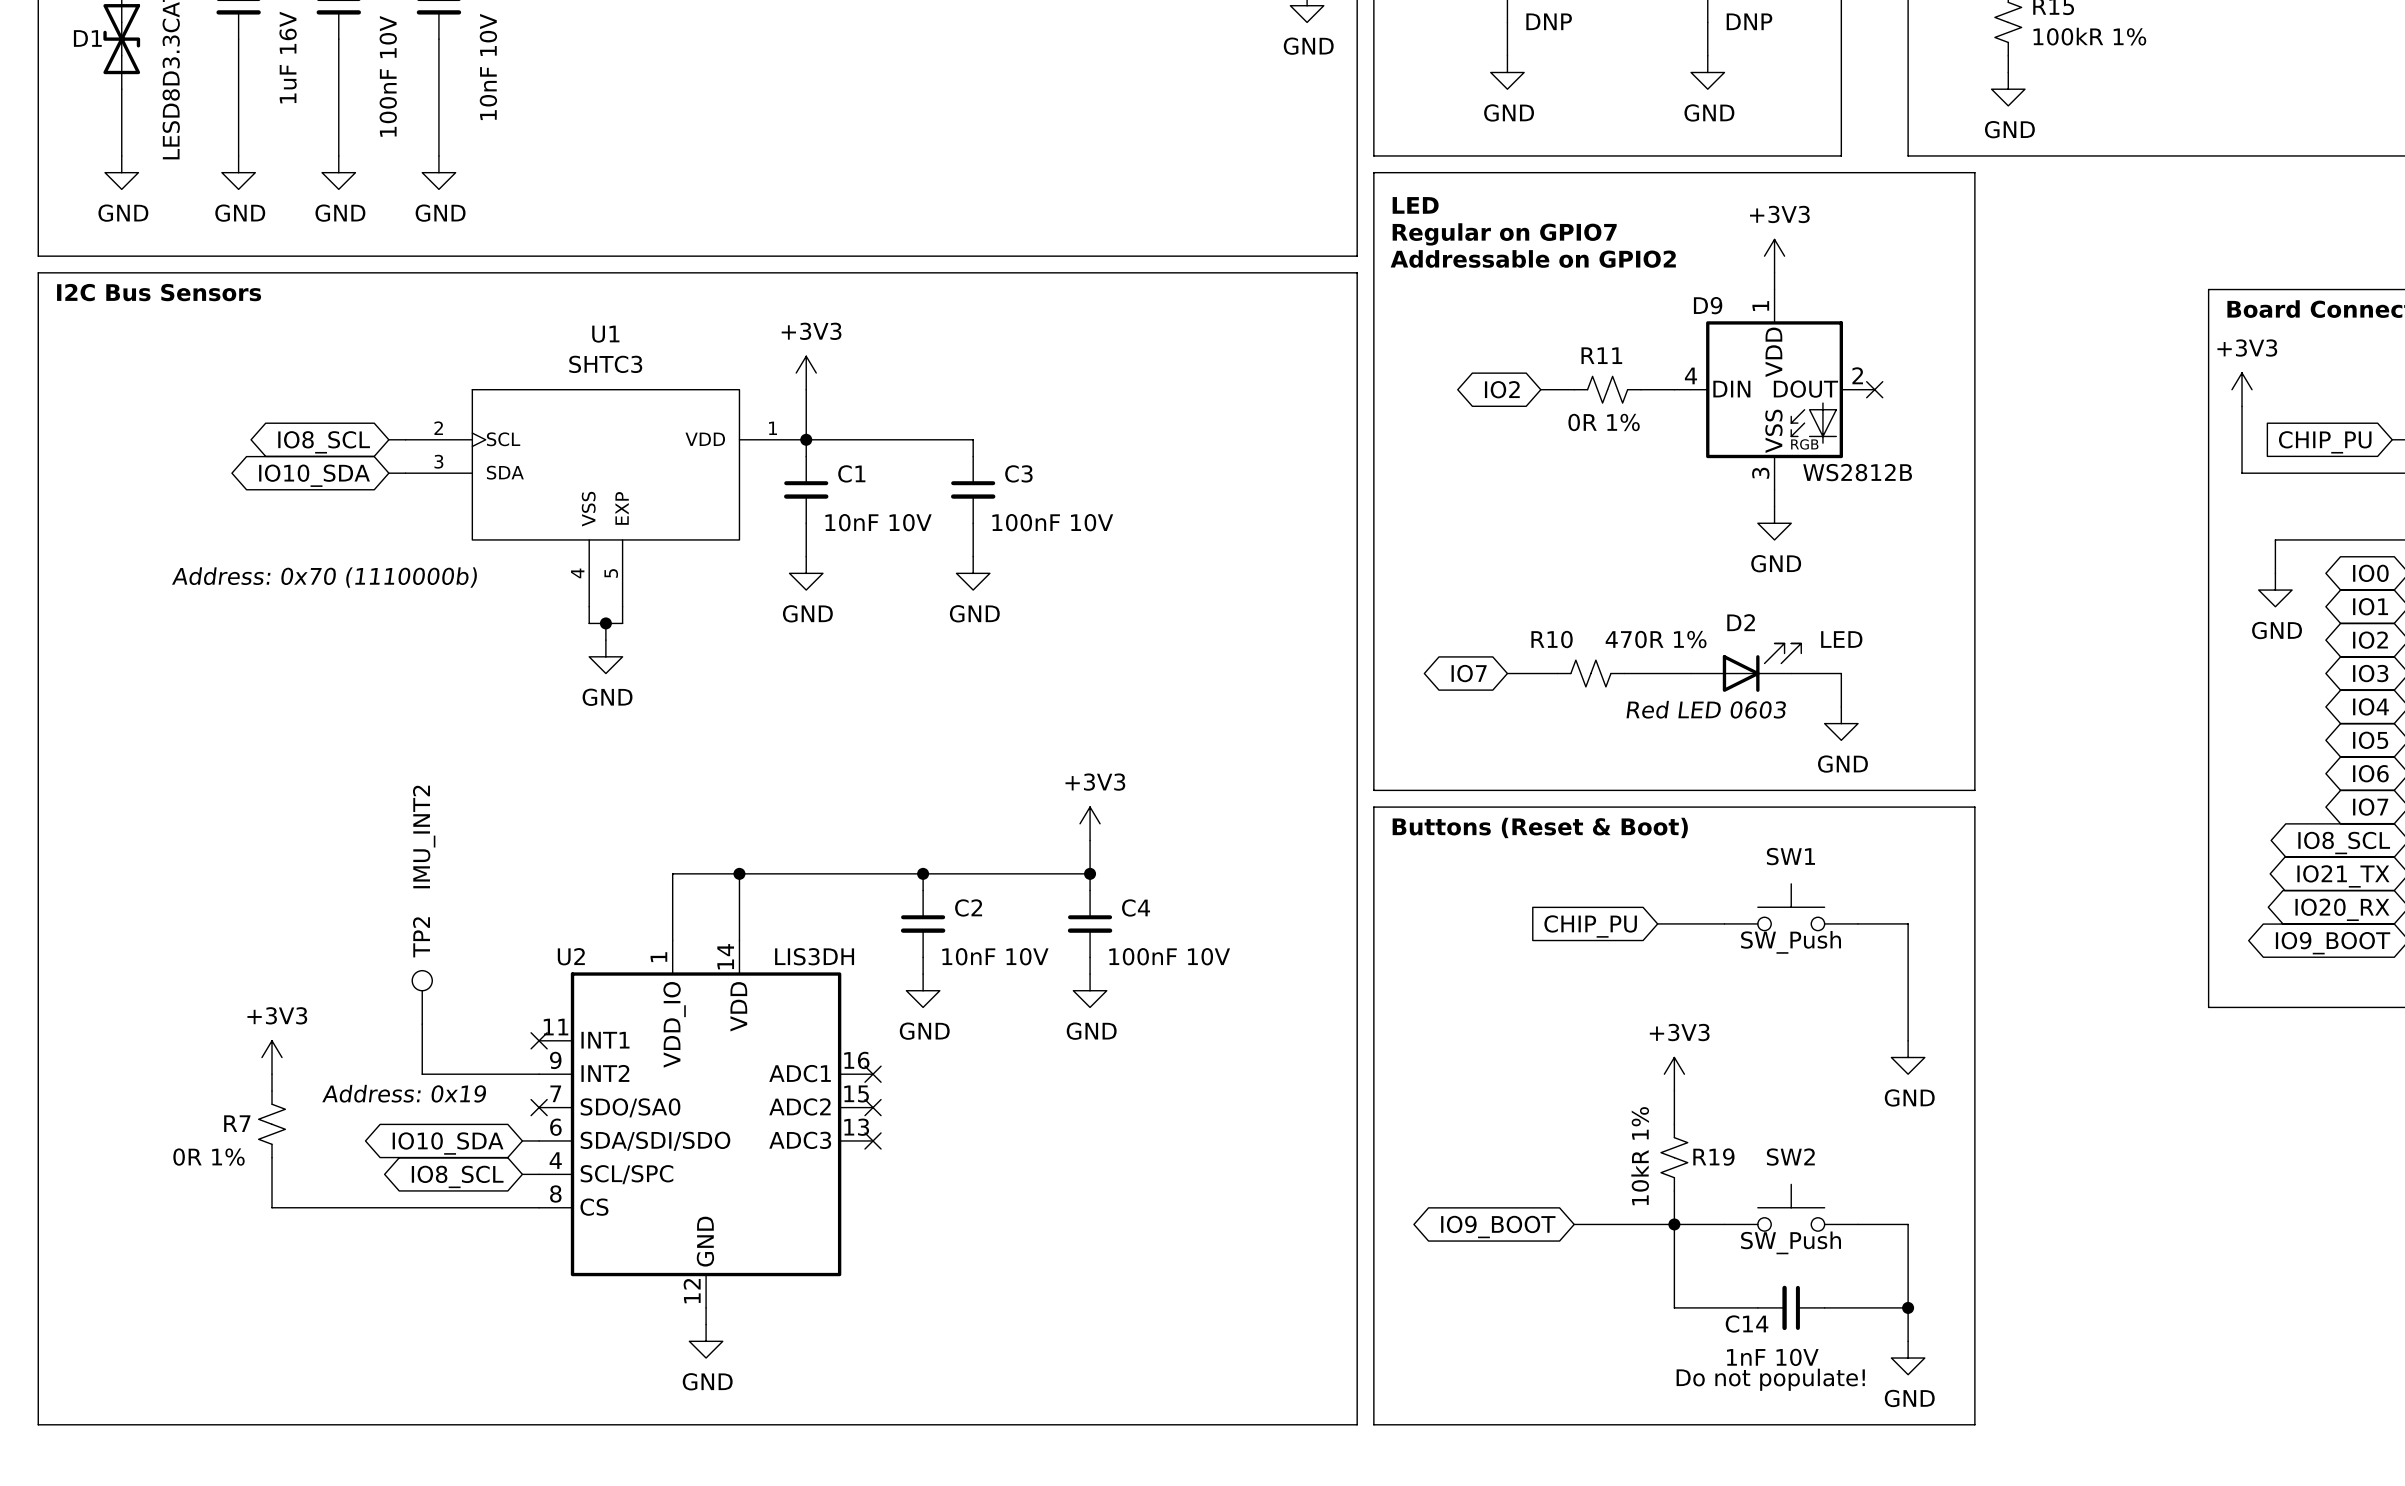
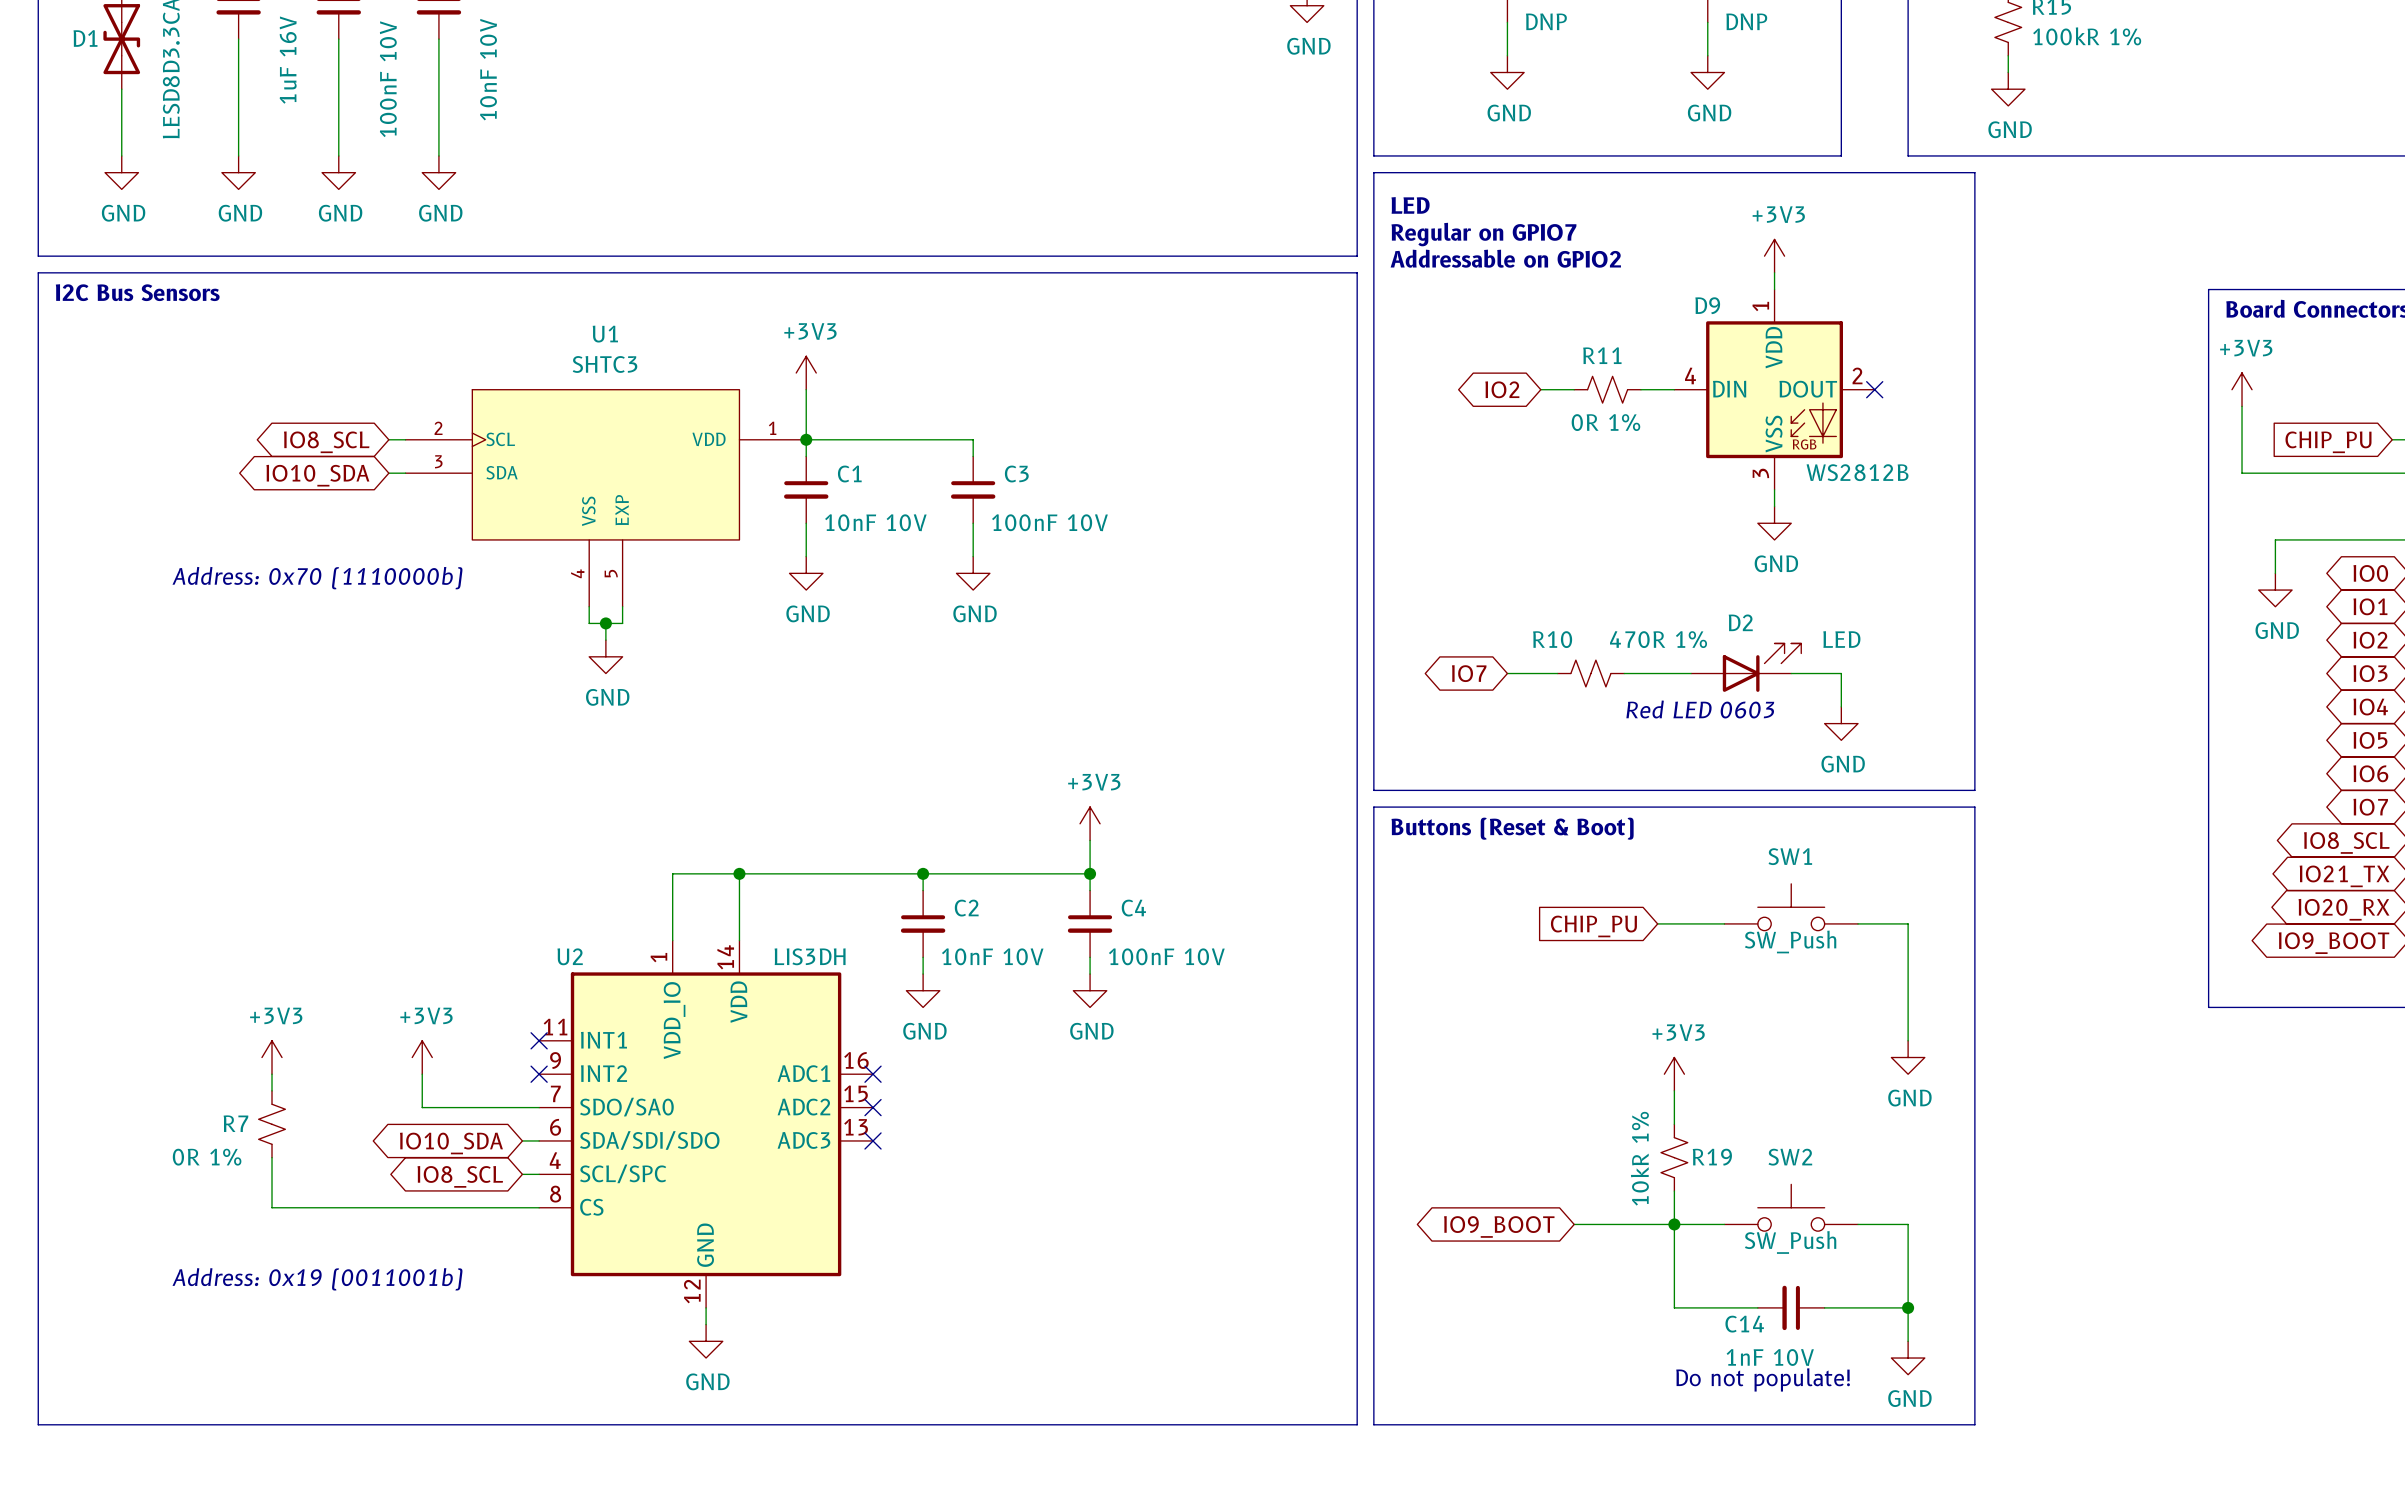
TP2: IMU_INT2 (422, 997) -> none
wire: (422, 1024) (422, 1074) (539, 1074) -> none
power symbol: none -> +3V3 (422, 1057)
wire: none -> (422, 1074) (422, 1107) (539, 1107)
text: Address: 0x19 (404, 1093) -> none
no-connect mark position: (539, 1107) -> (539, 1074)
text: none -> Address: 0x19 (0011001b) (317, 1279)

